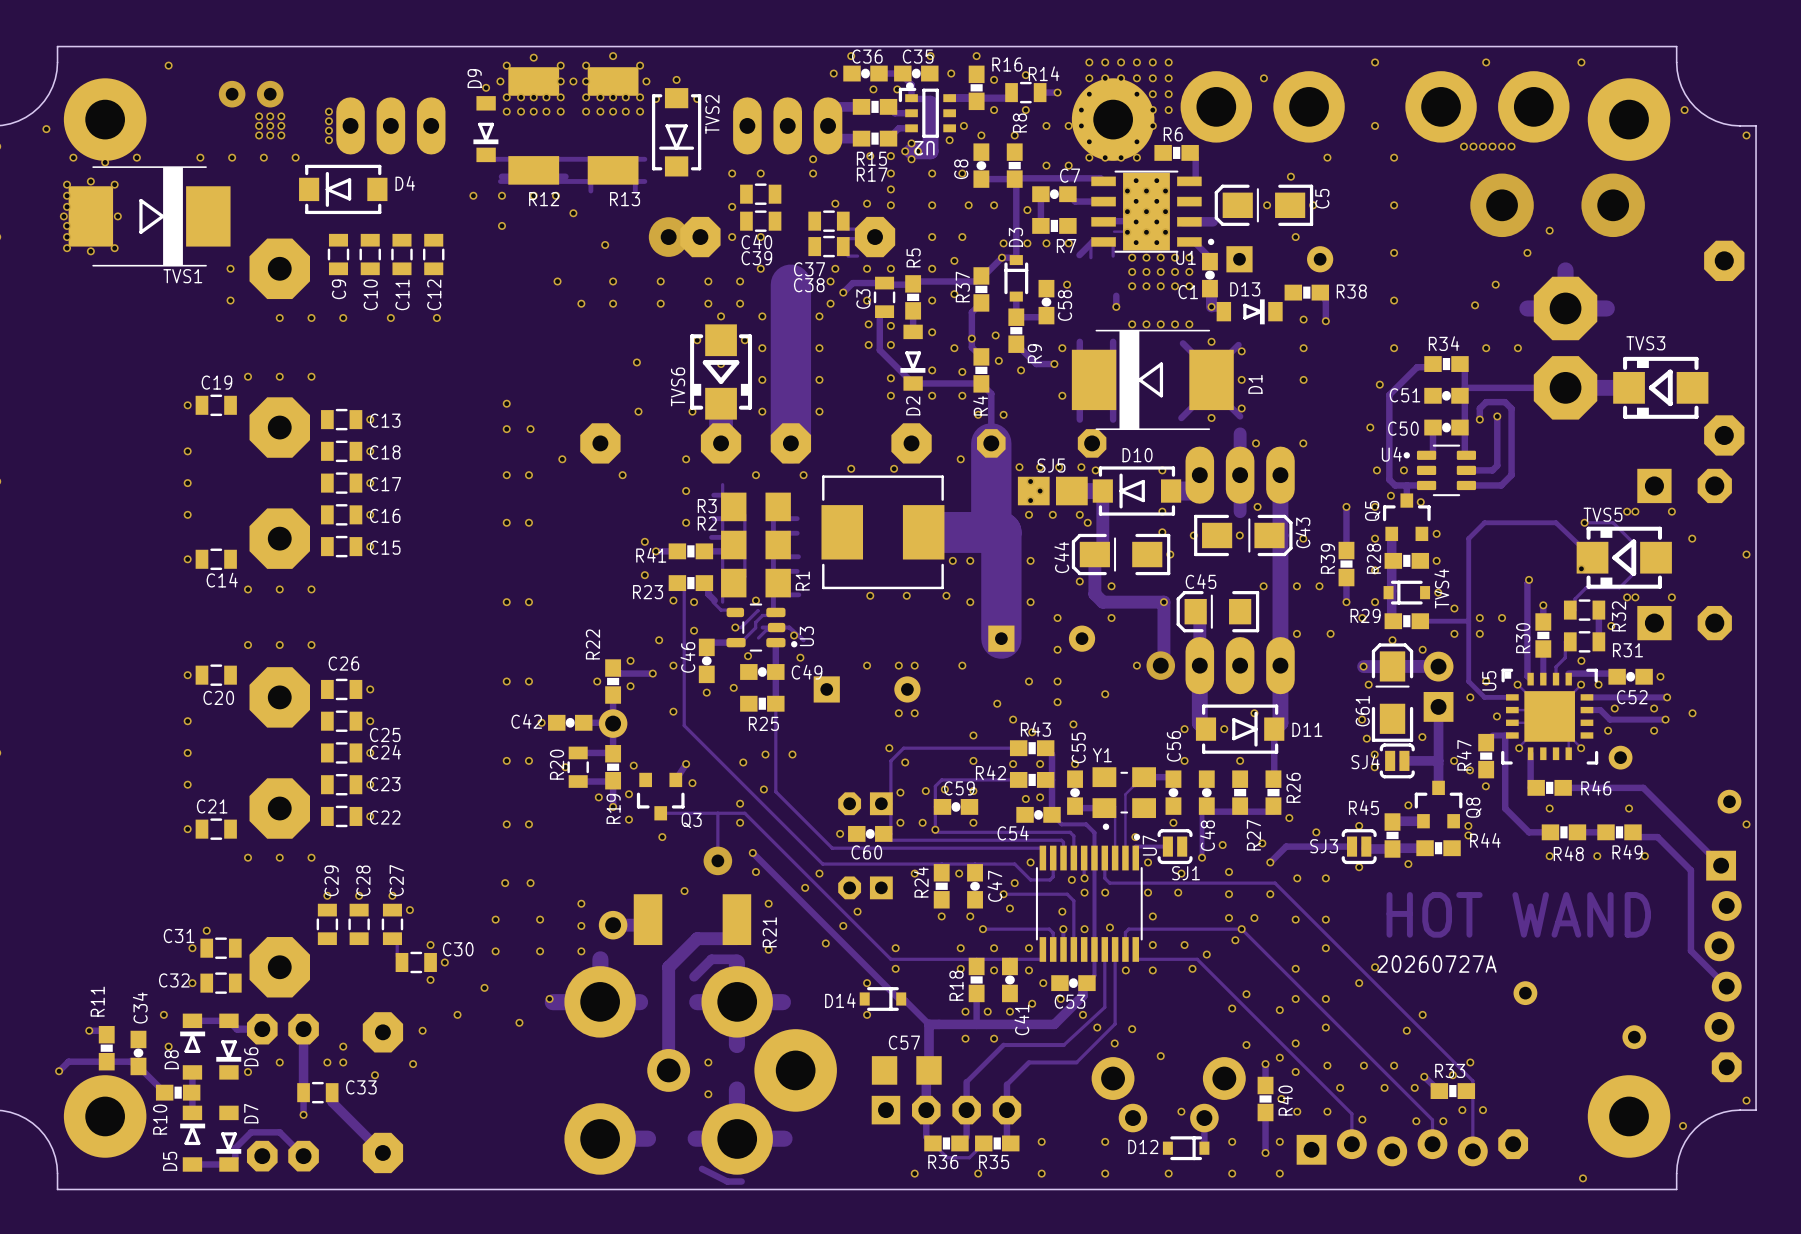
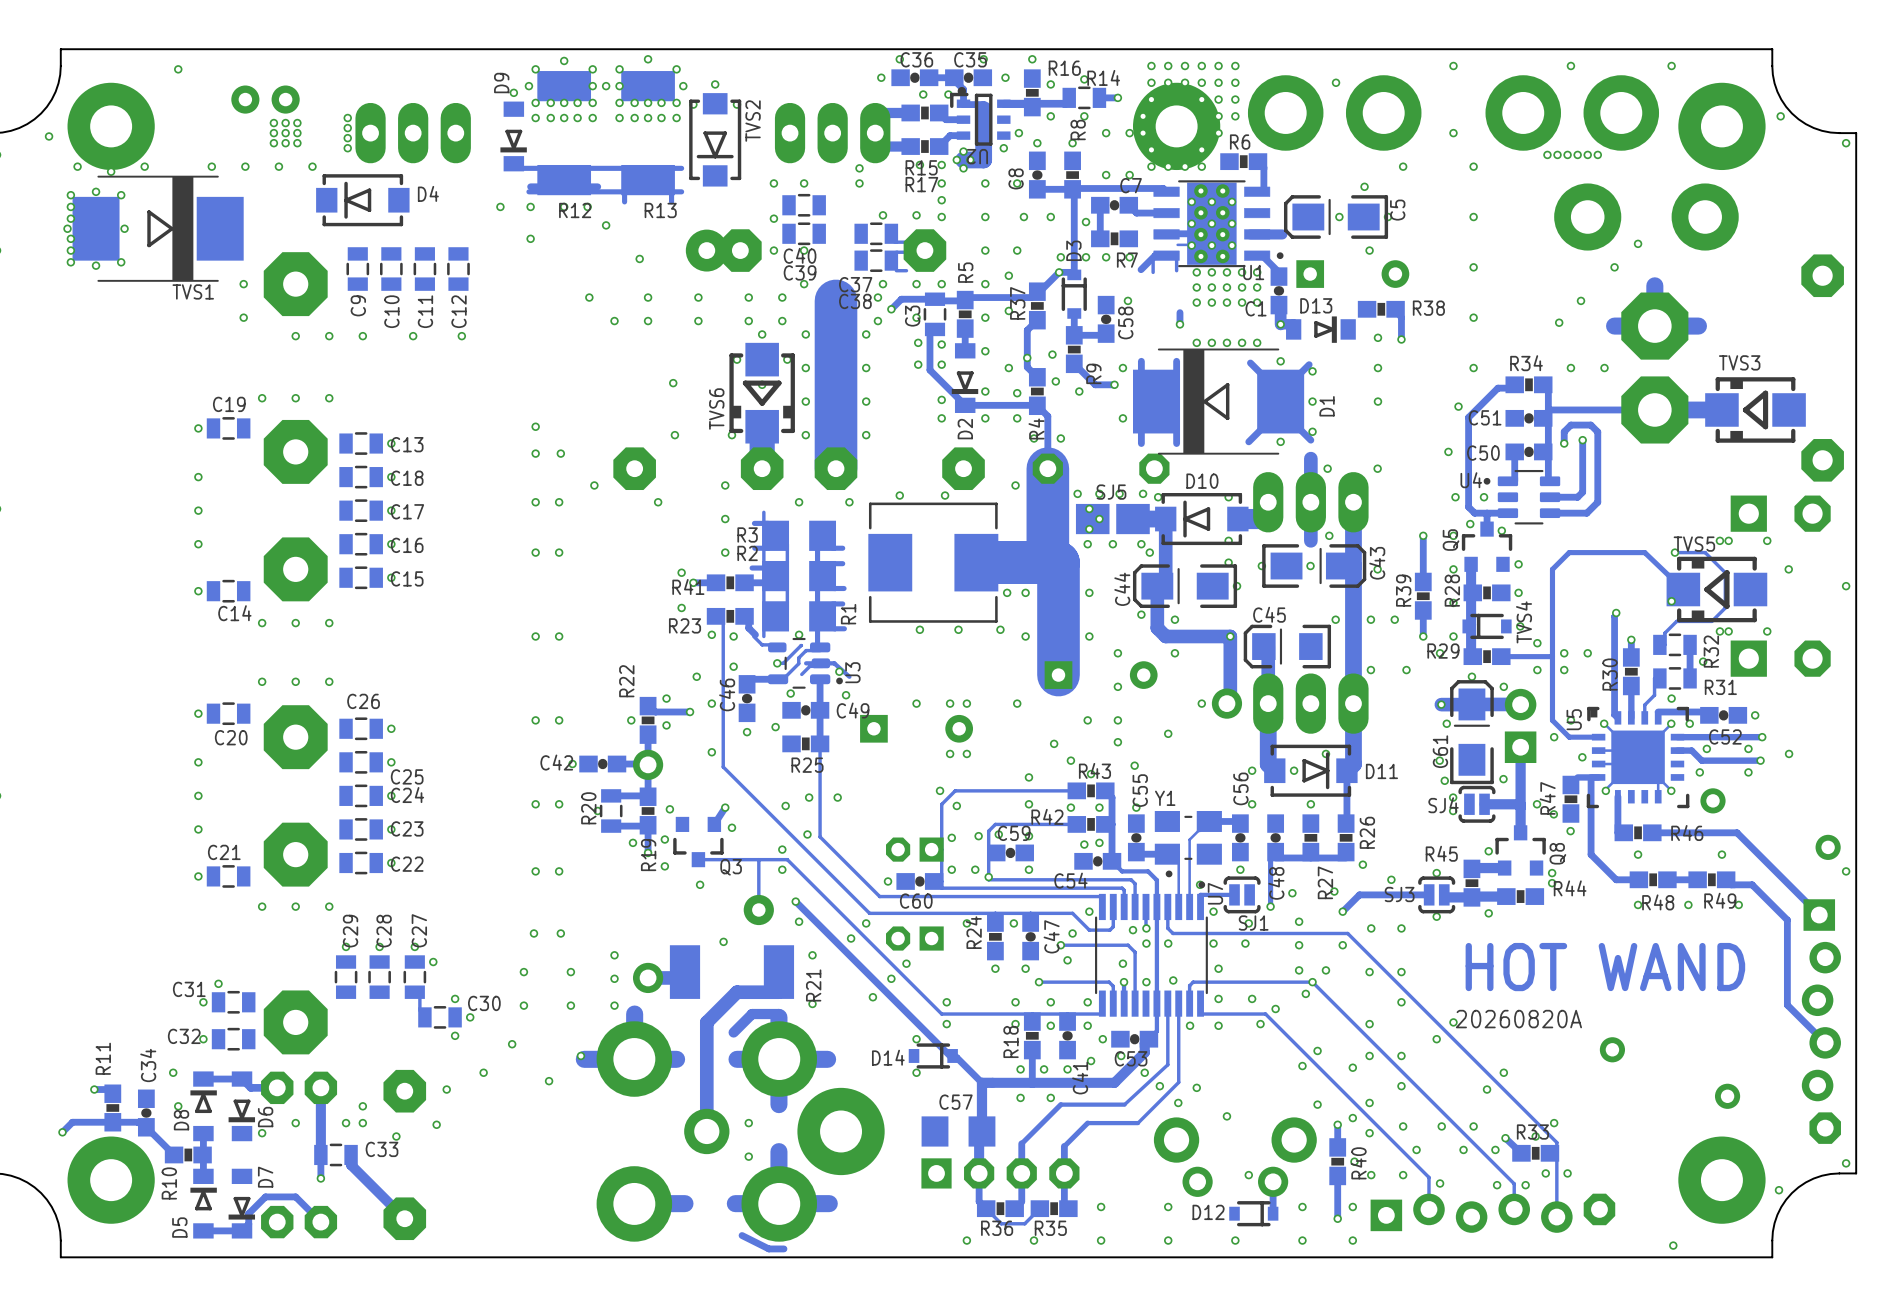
drawing shape: [1377, 892, 1652, 973] -> [1455, 942, 1746, 1029]

